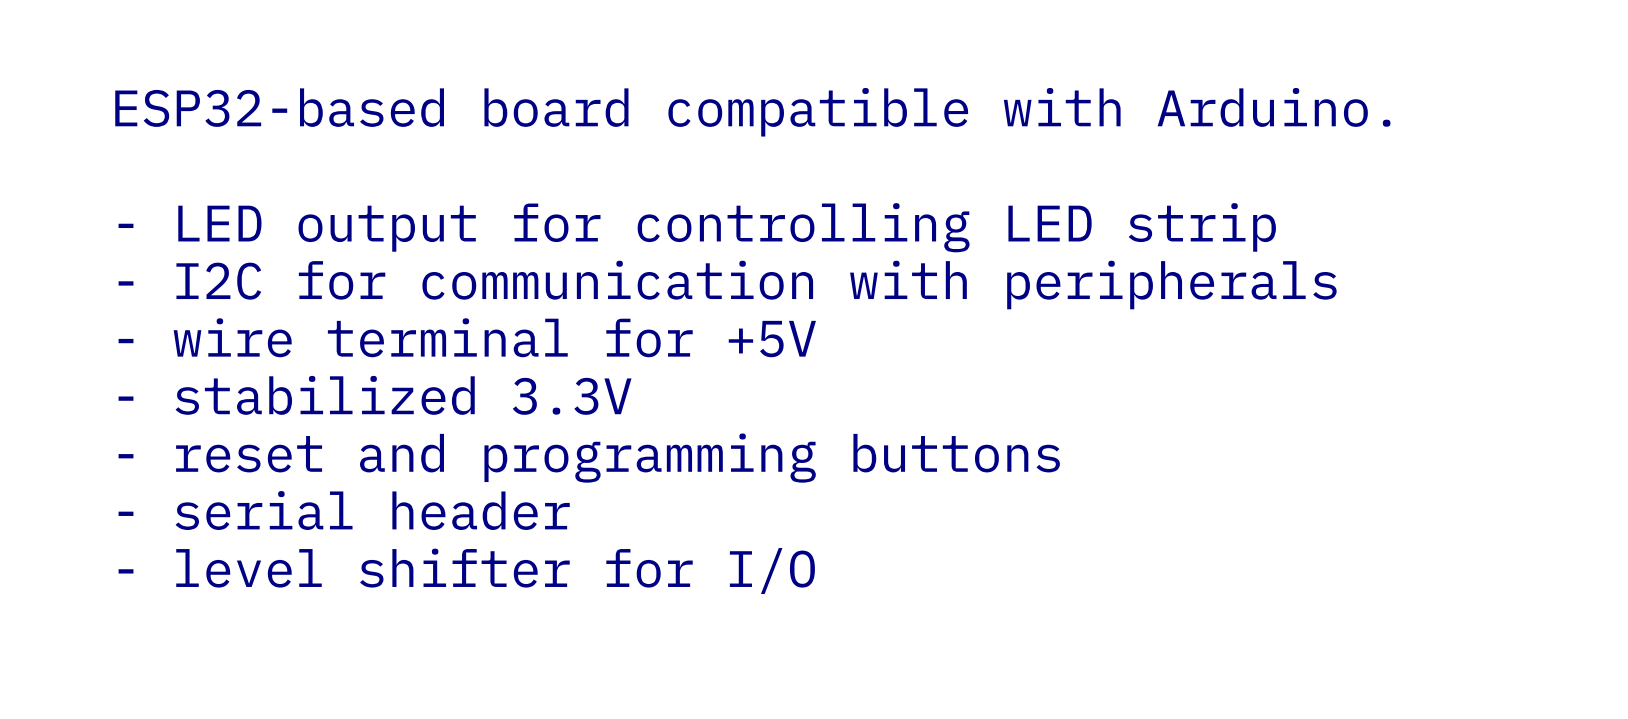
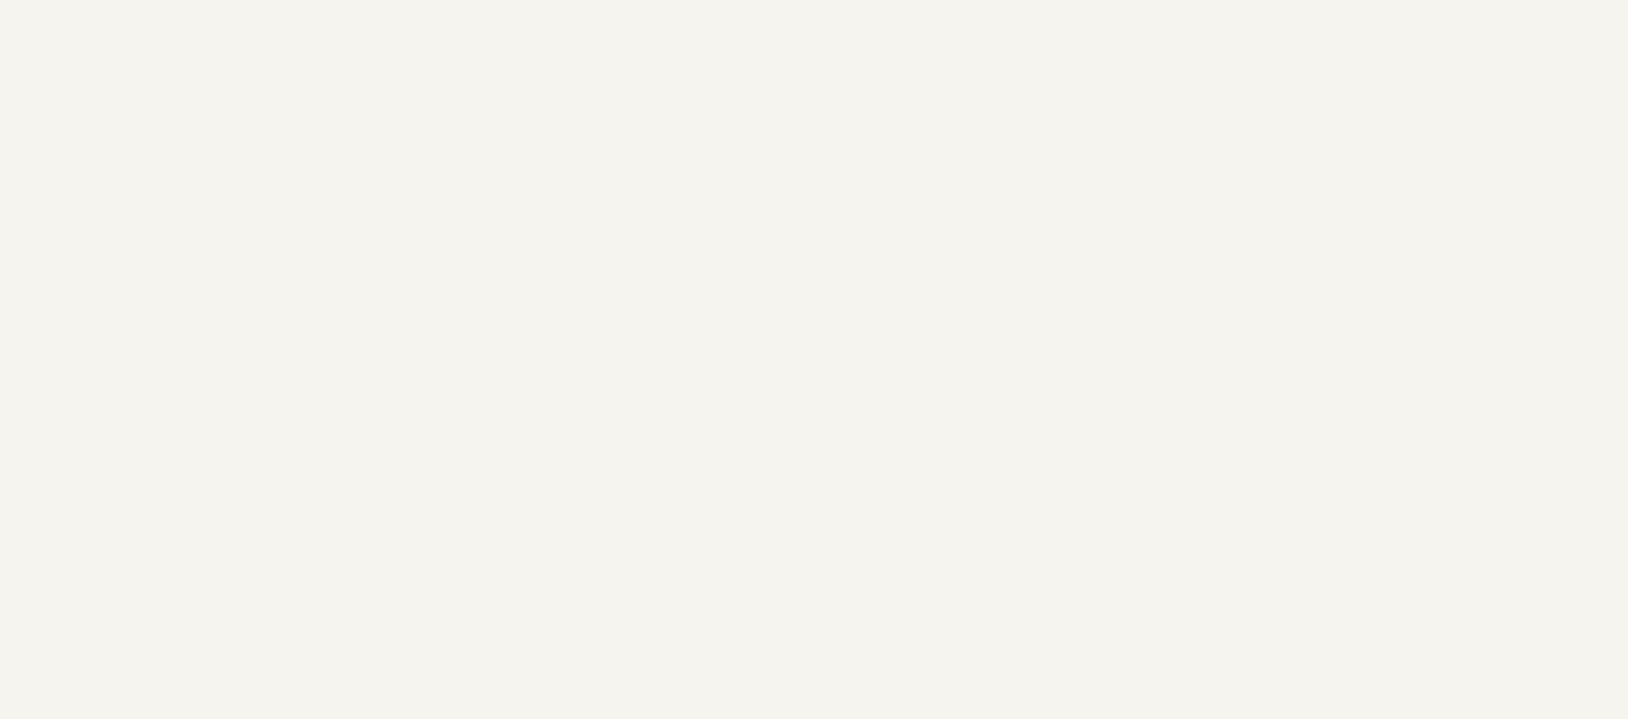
text: ESP32-based board compatible with Arduino. (752, 112) -> none
text: - LED output for controlling LED strip (697, 227) -> none
text: - I2C for communication with peripherals (727, 285) -> none
text: - wire terminal for +5V (467, 337) -> none
text: - stabilized 3.3V (375, 395) -> none
text: - reset and programming buttons (589, 458) -> none
text: - serial header (344, 510) -> none
text: - level shifter for I/O (466, 571) -> none

